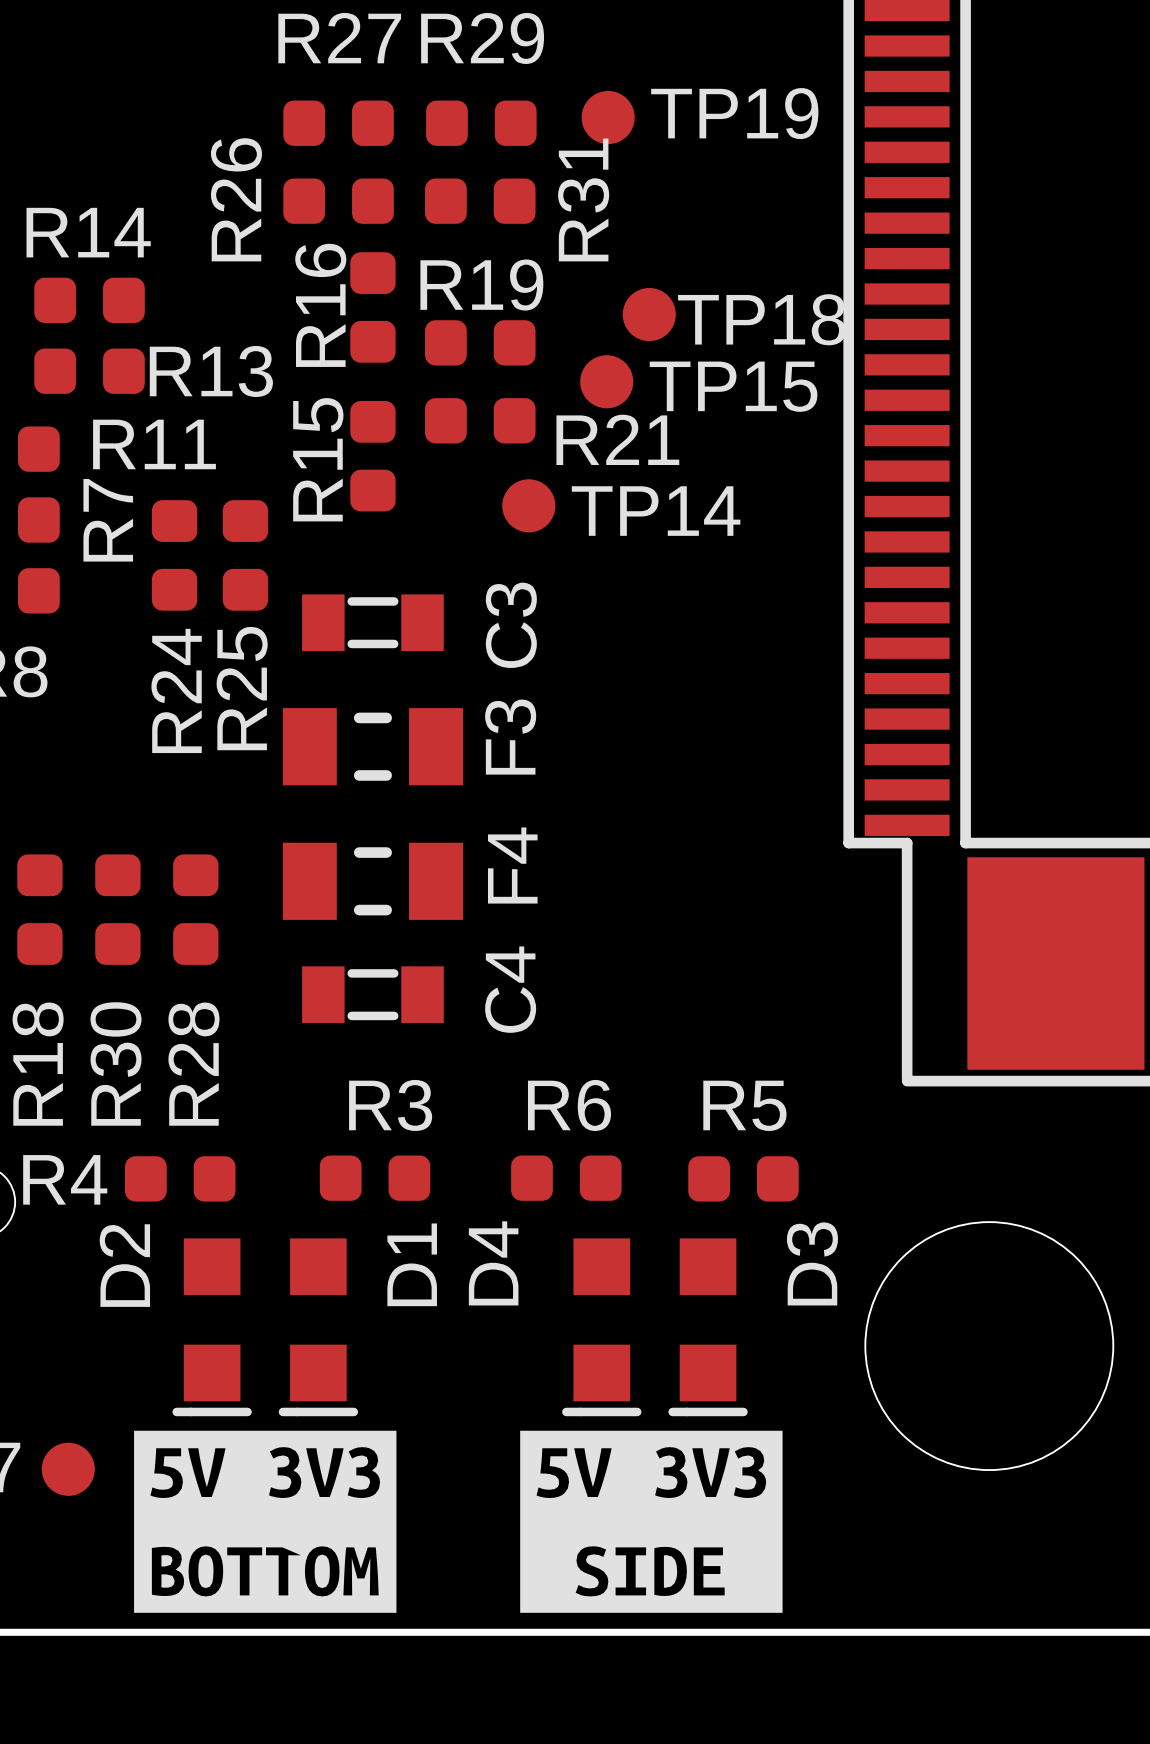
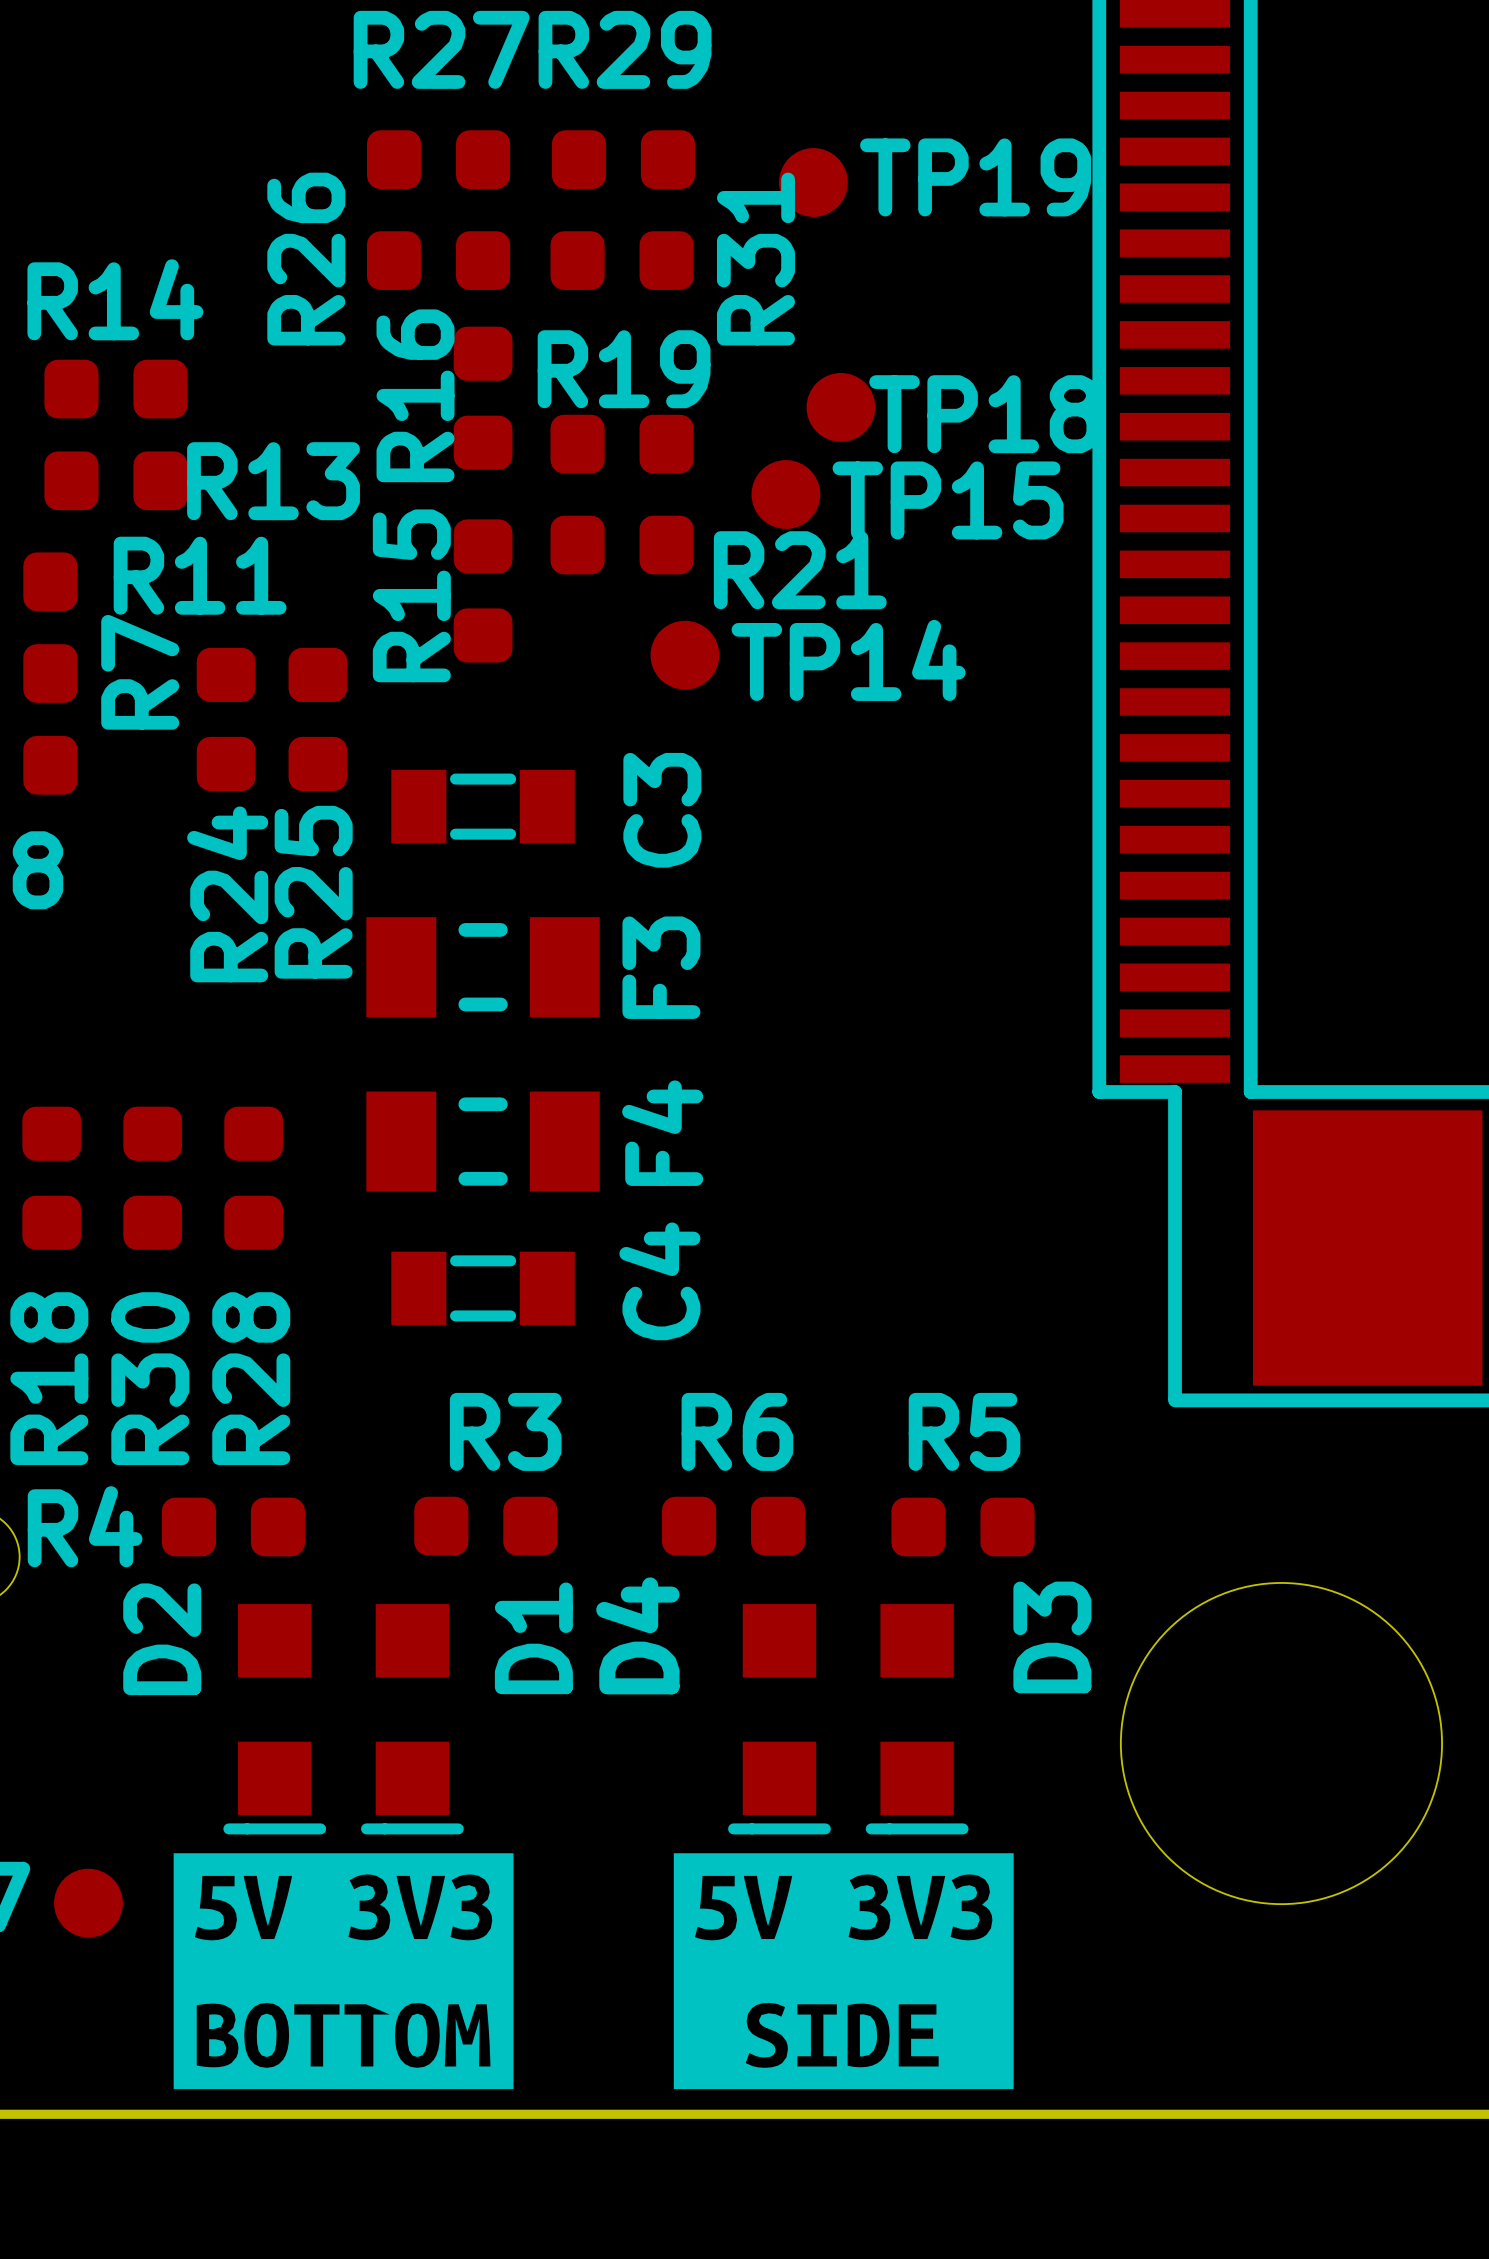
TP19 position: (608, 117) -> (813, 182)

